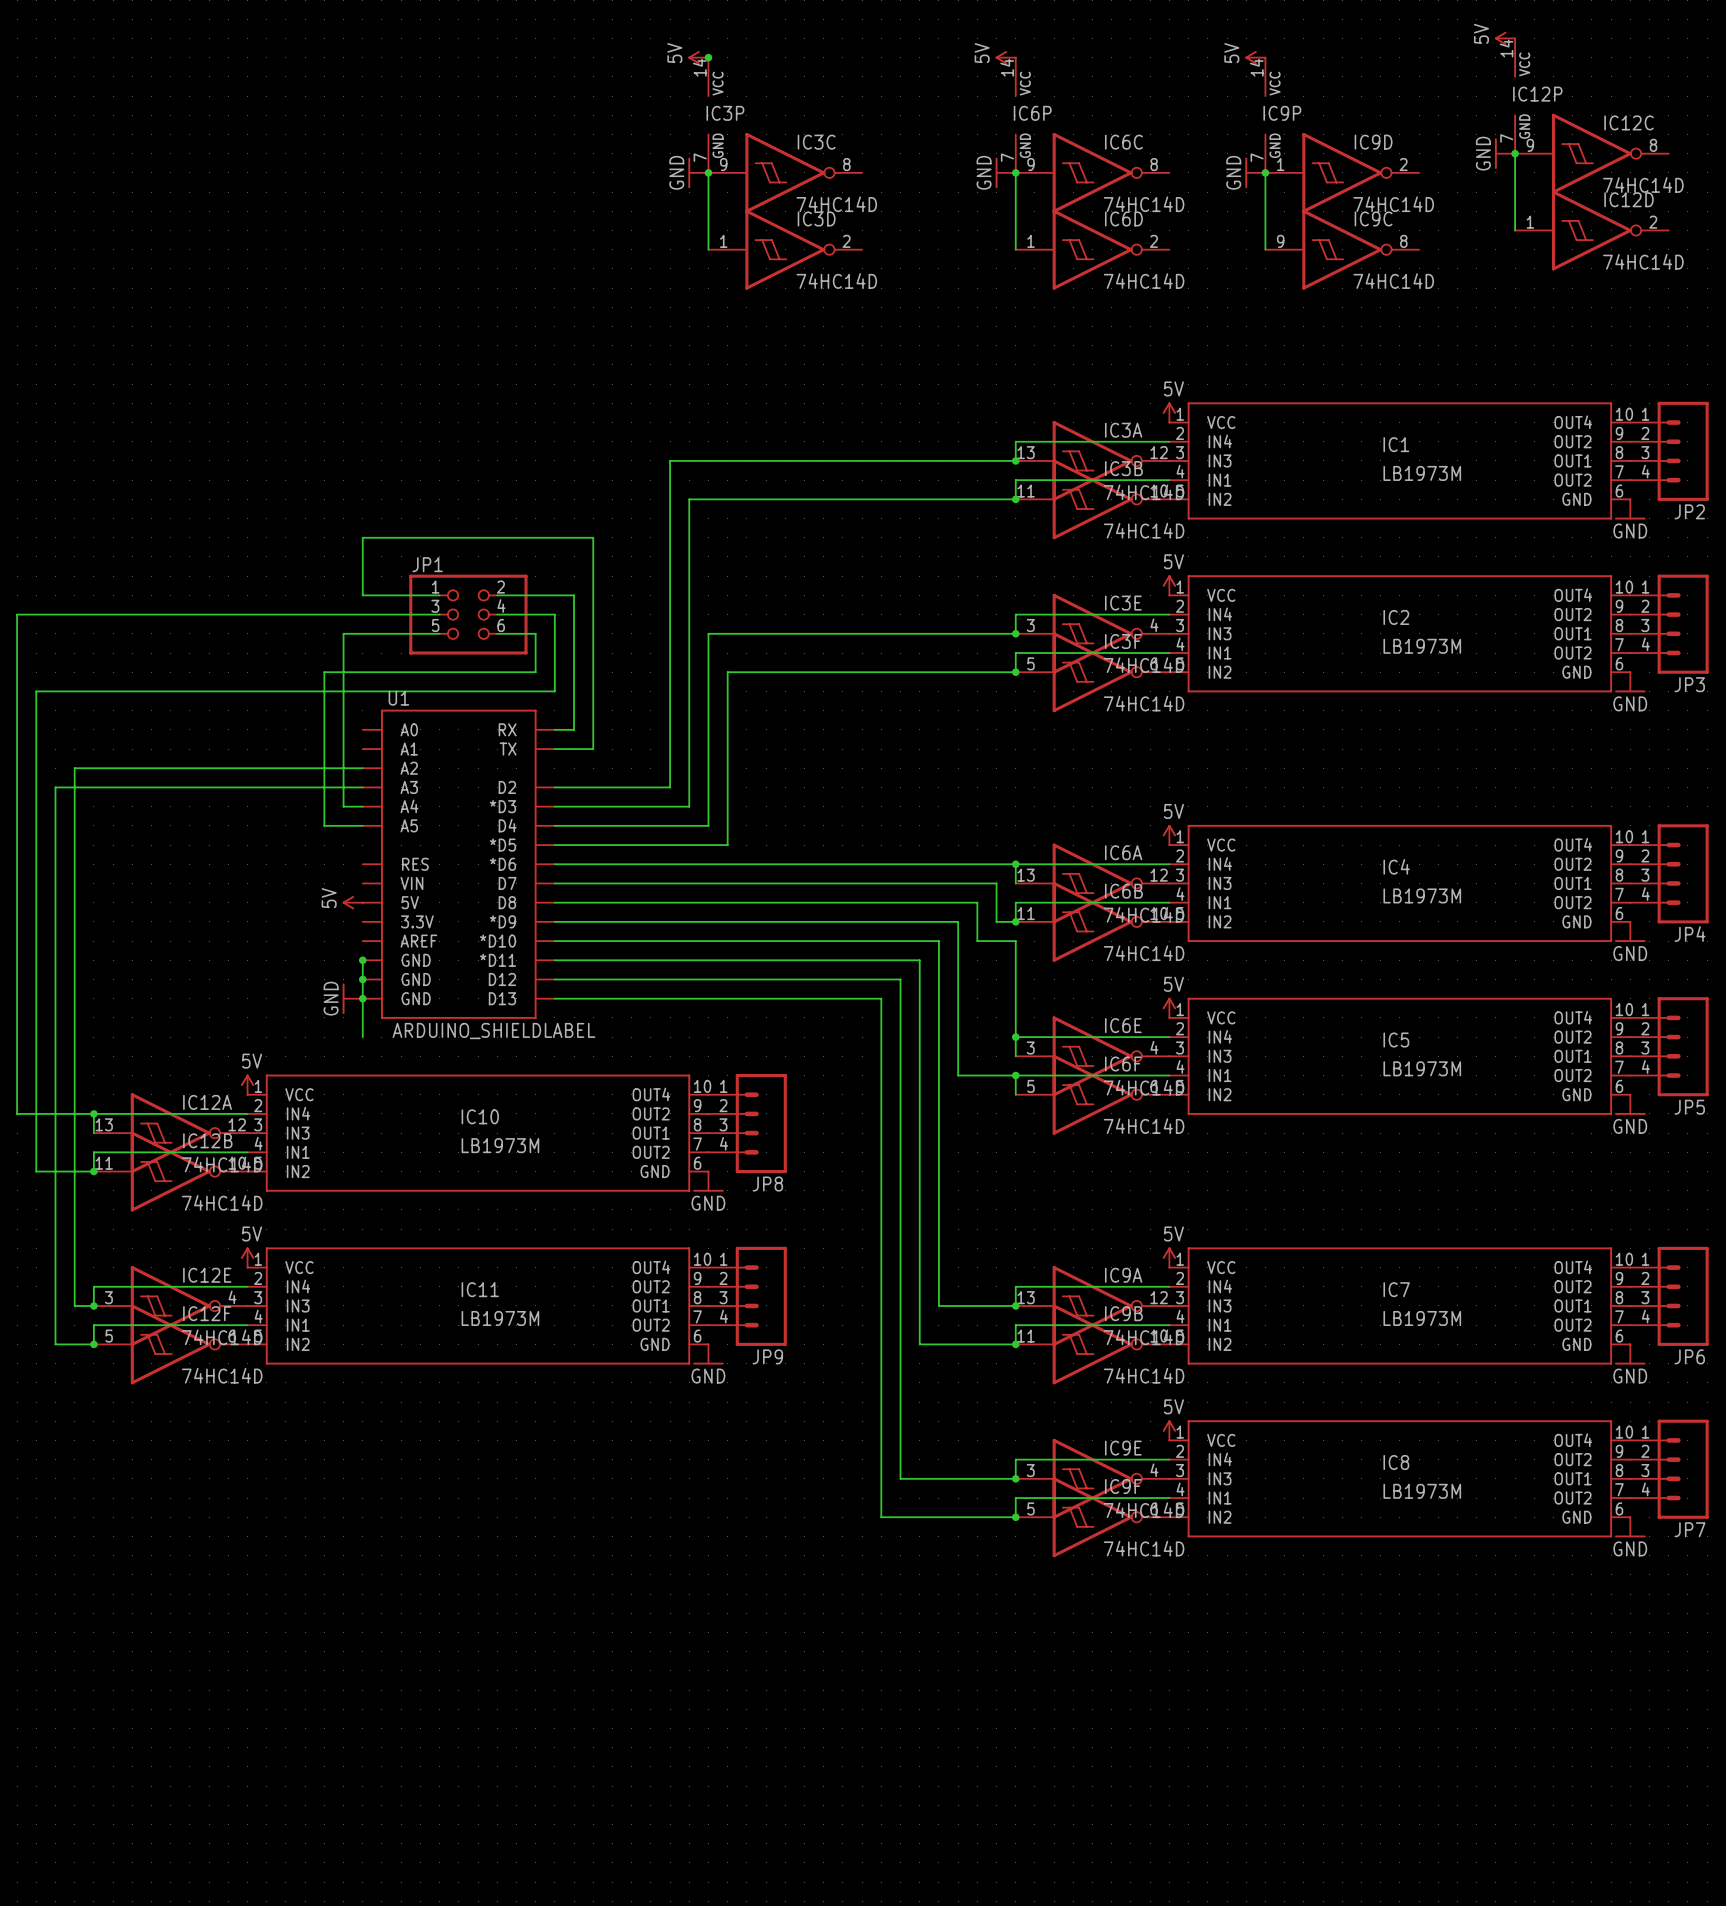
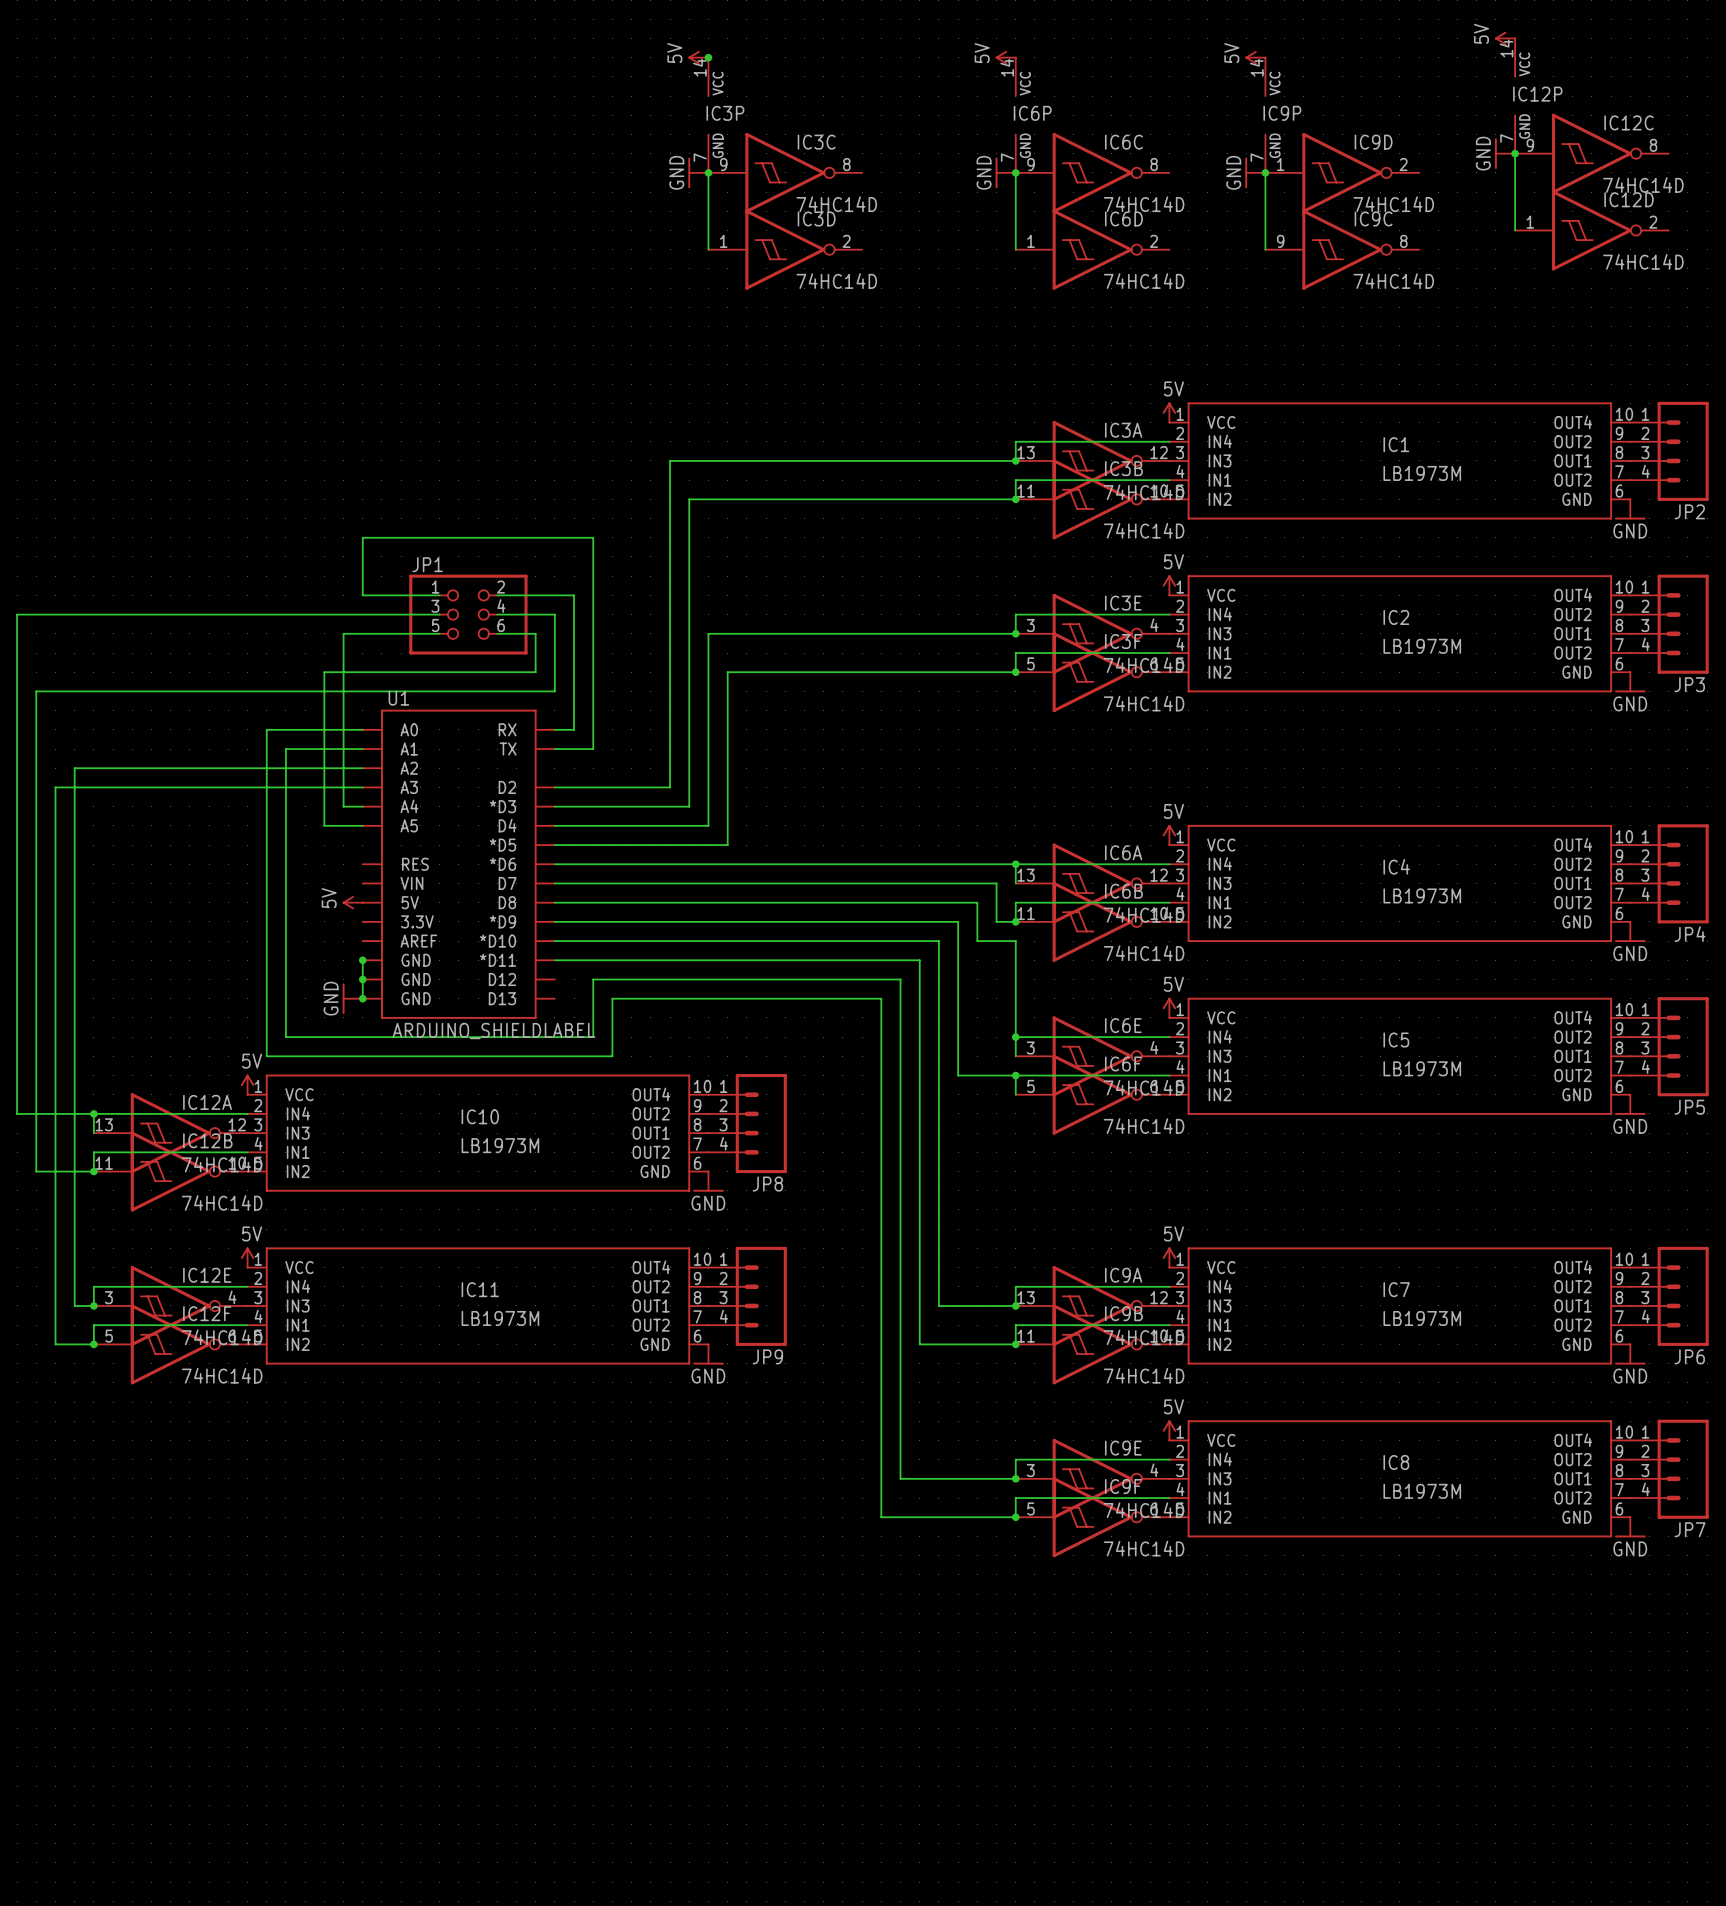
wire: (554, 979) (593, 979) -> (362, 749) (285, 749) (285, 1037) (593, 1037) (593, 979)
wire: (362, 998) (362, 1037) -> none
wire: (554, 998) (612, 998) -> (362, 729) (266, 729) (266, 1056) (612, 1056) (612, 998)

